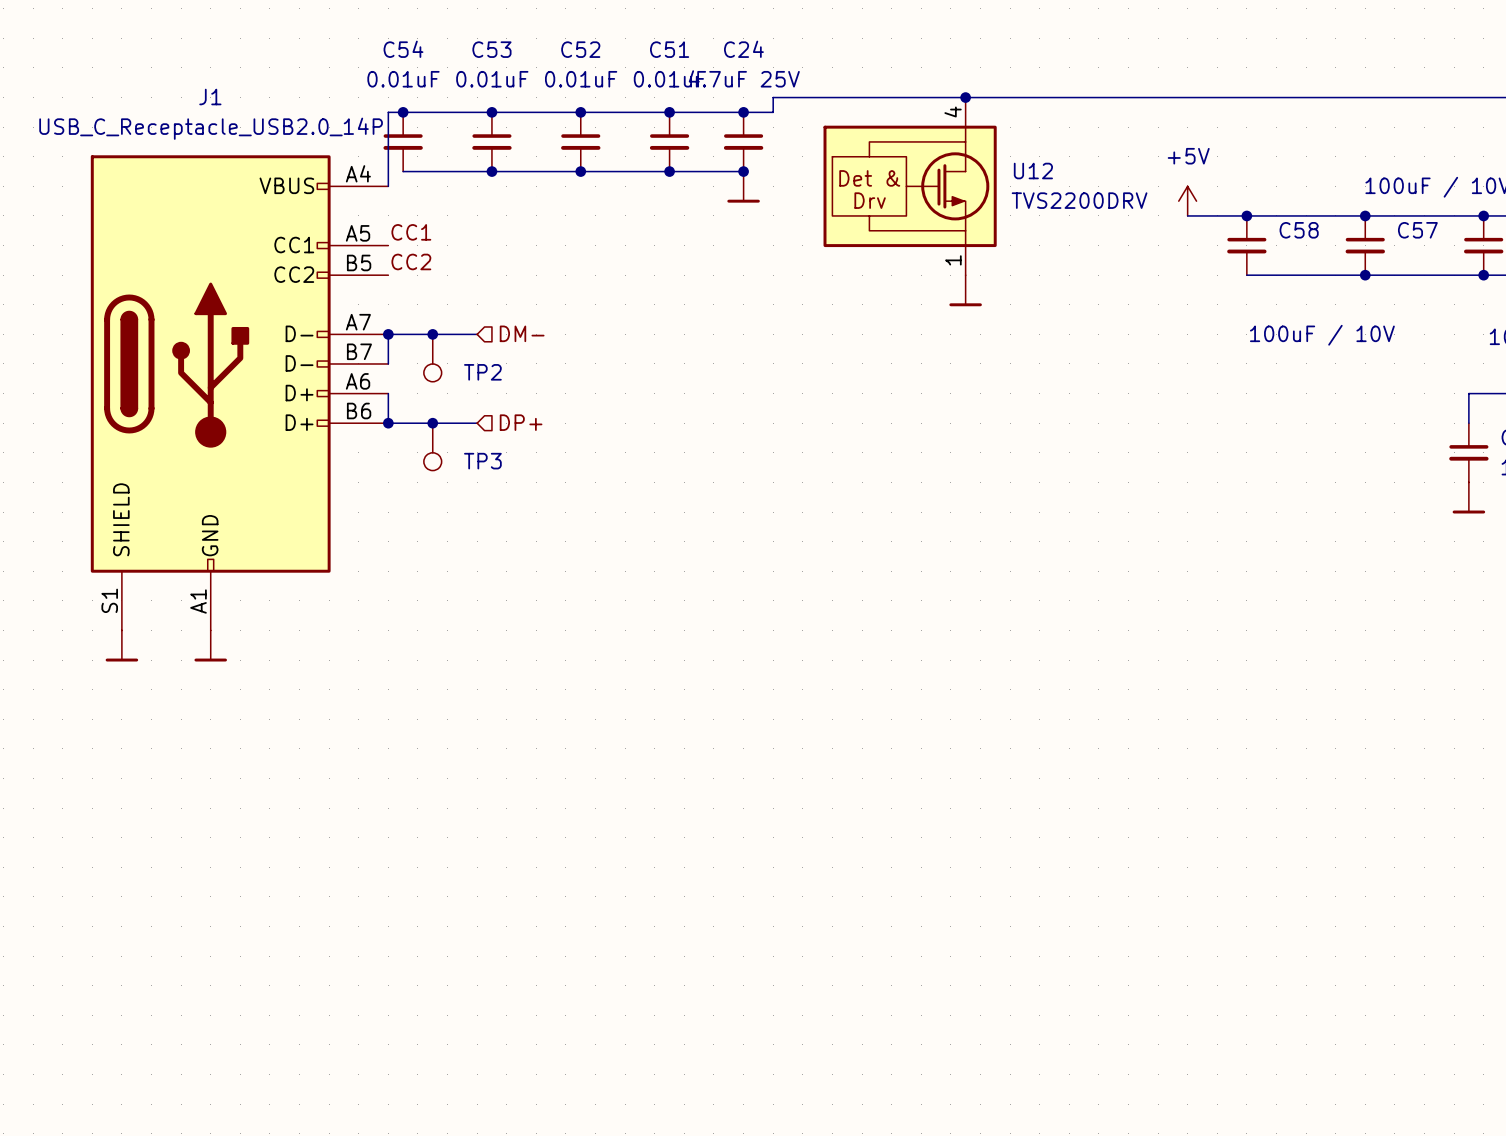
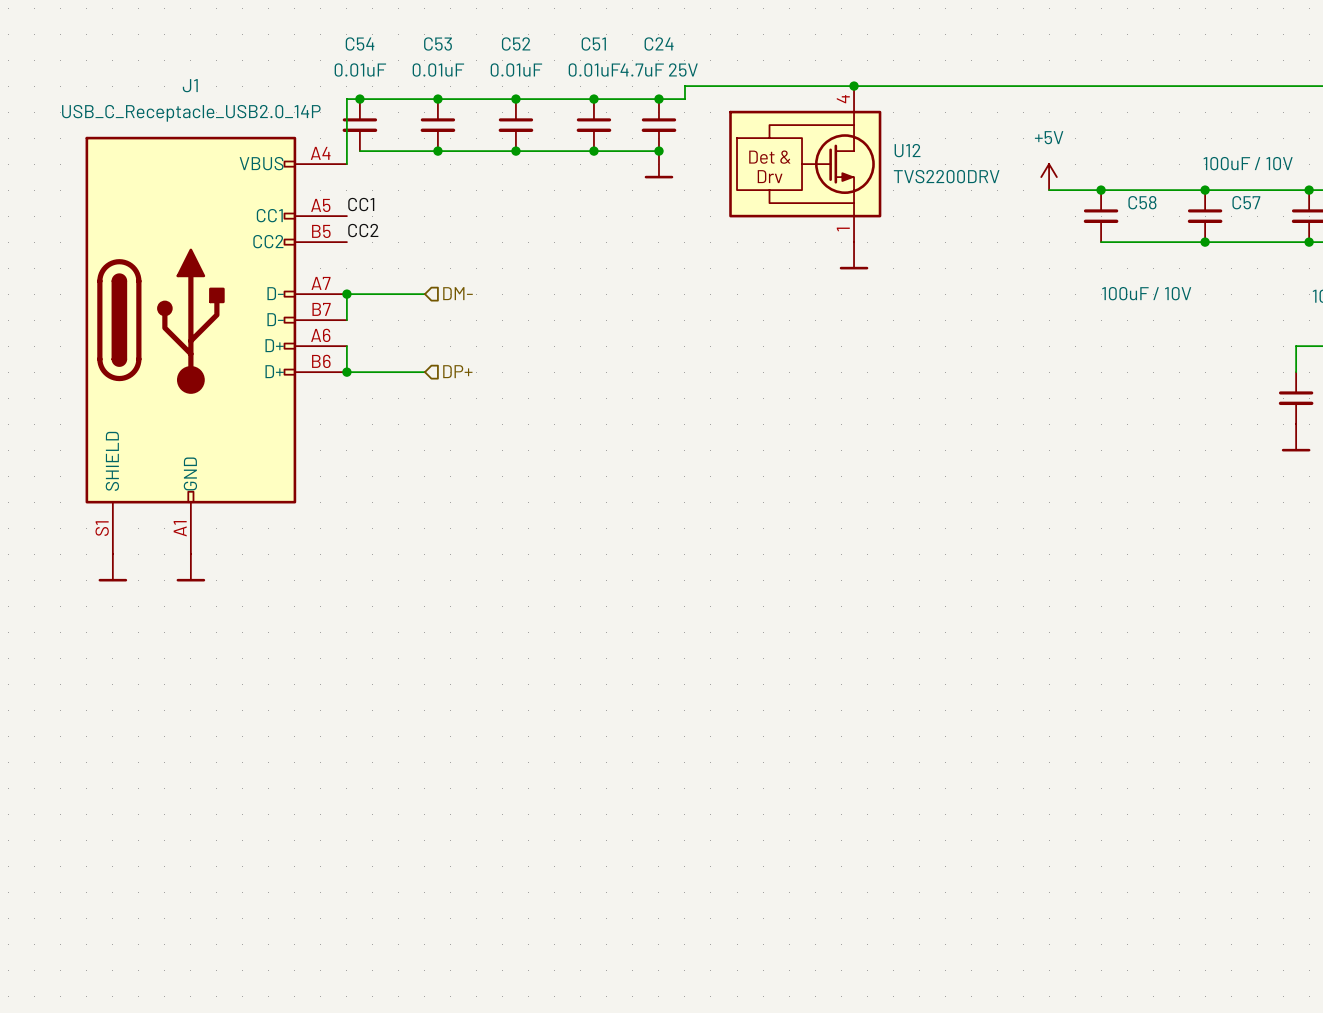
junction: (432, 334) -> none
TP2: (432, 358) -> none
junction: (432, 423) -> none
TP3: (432, 446) -> none

